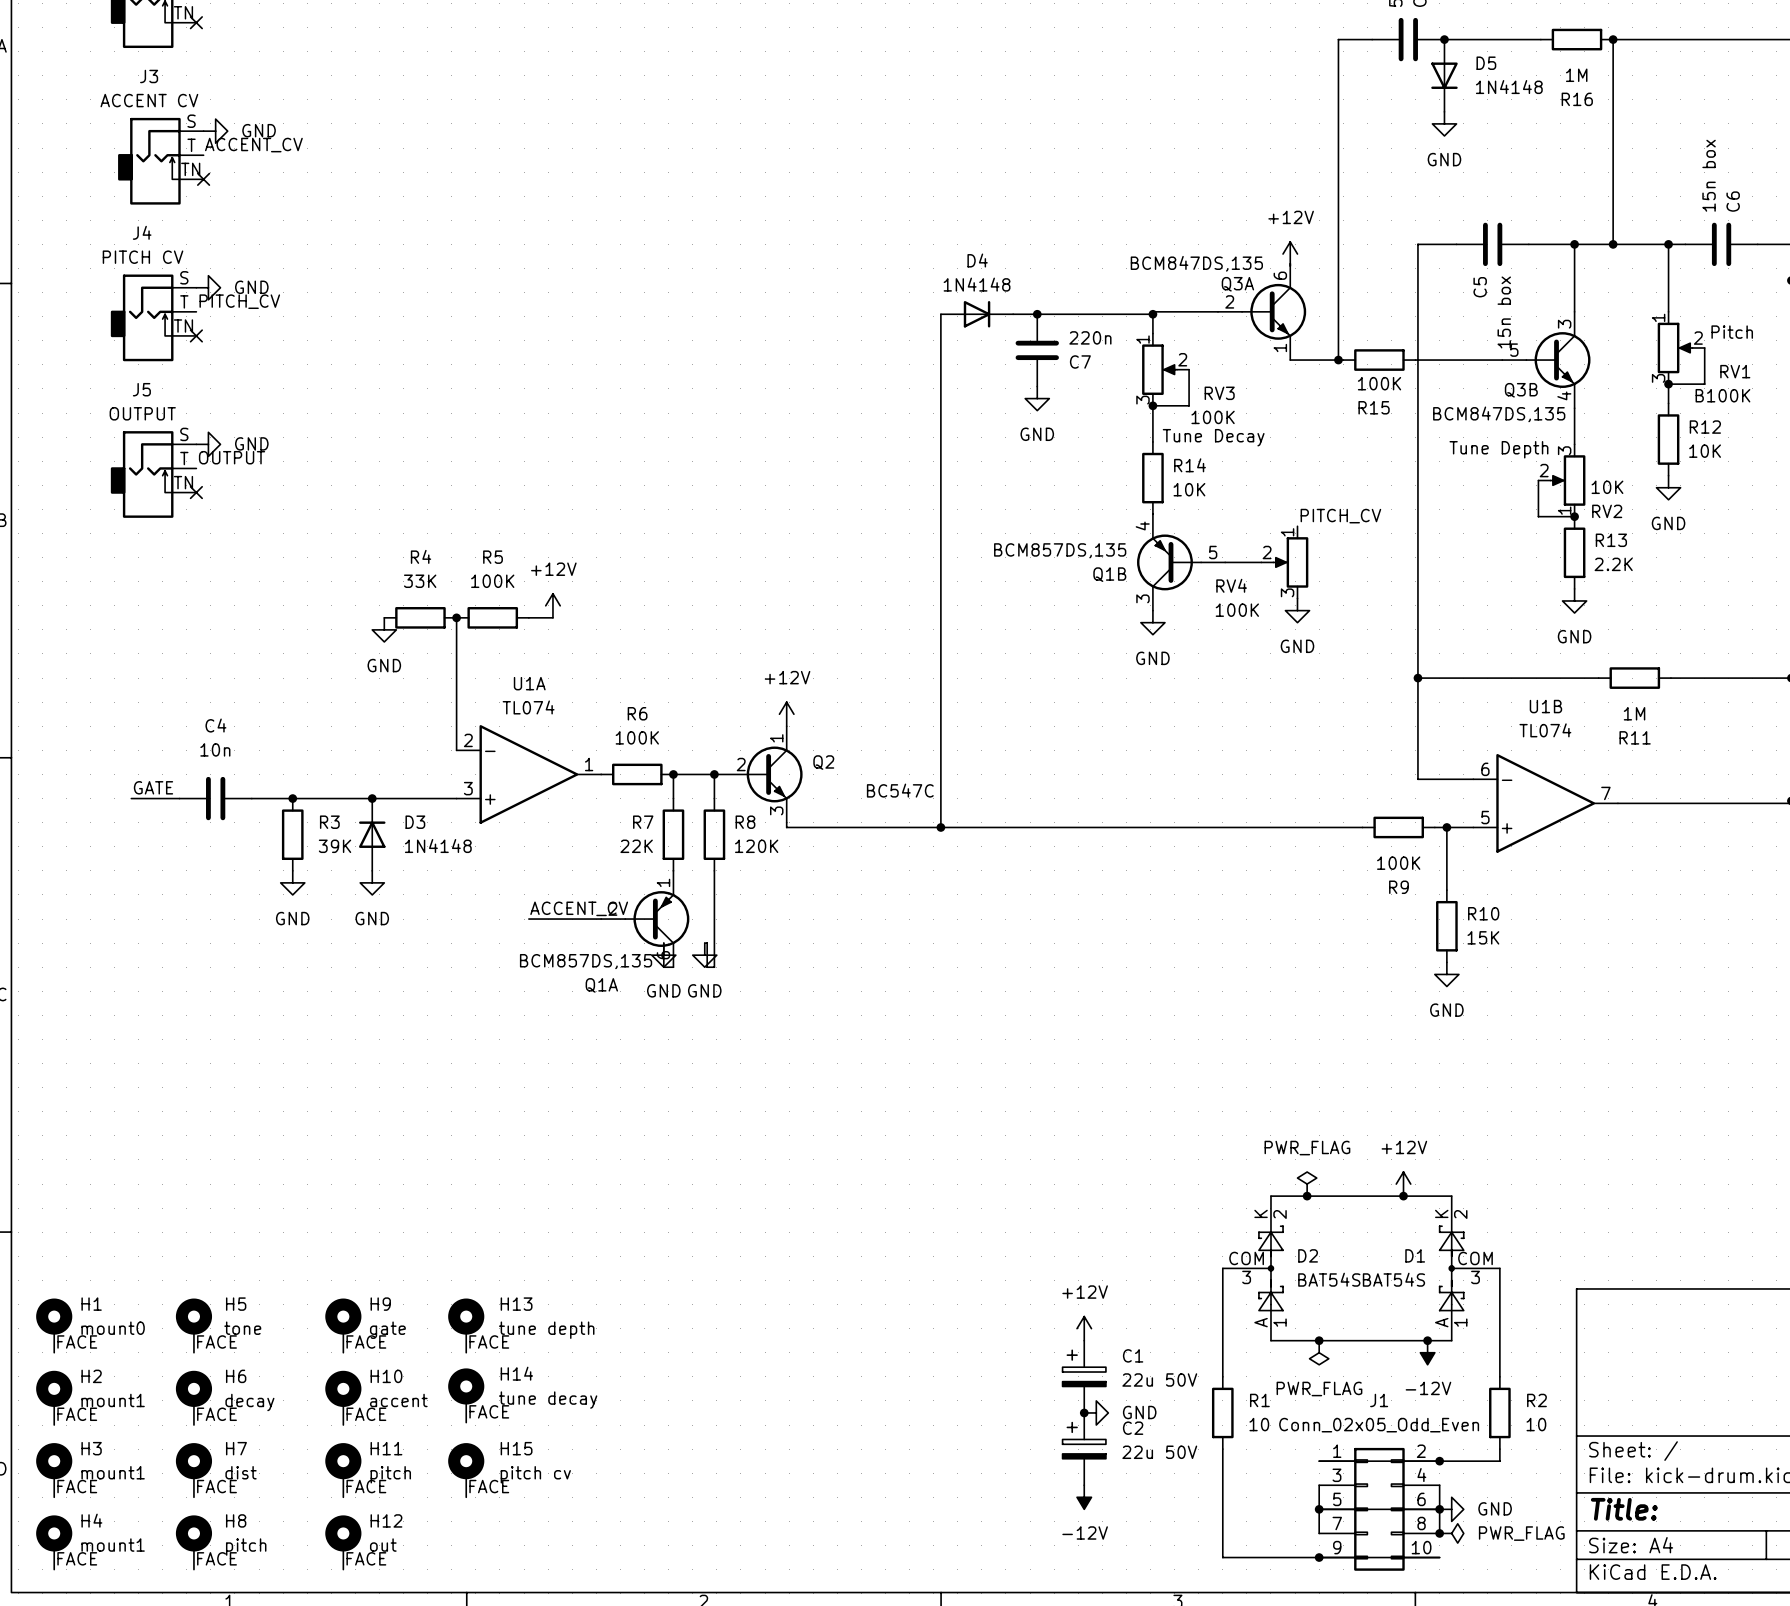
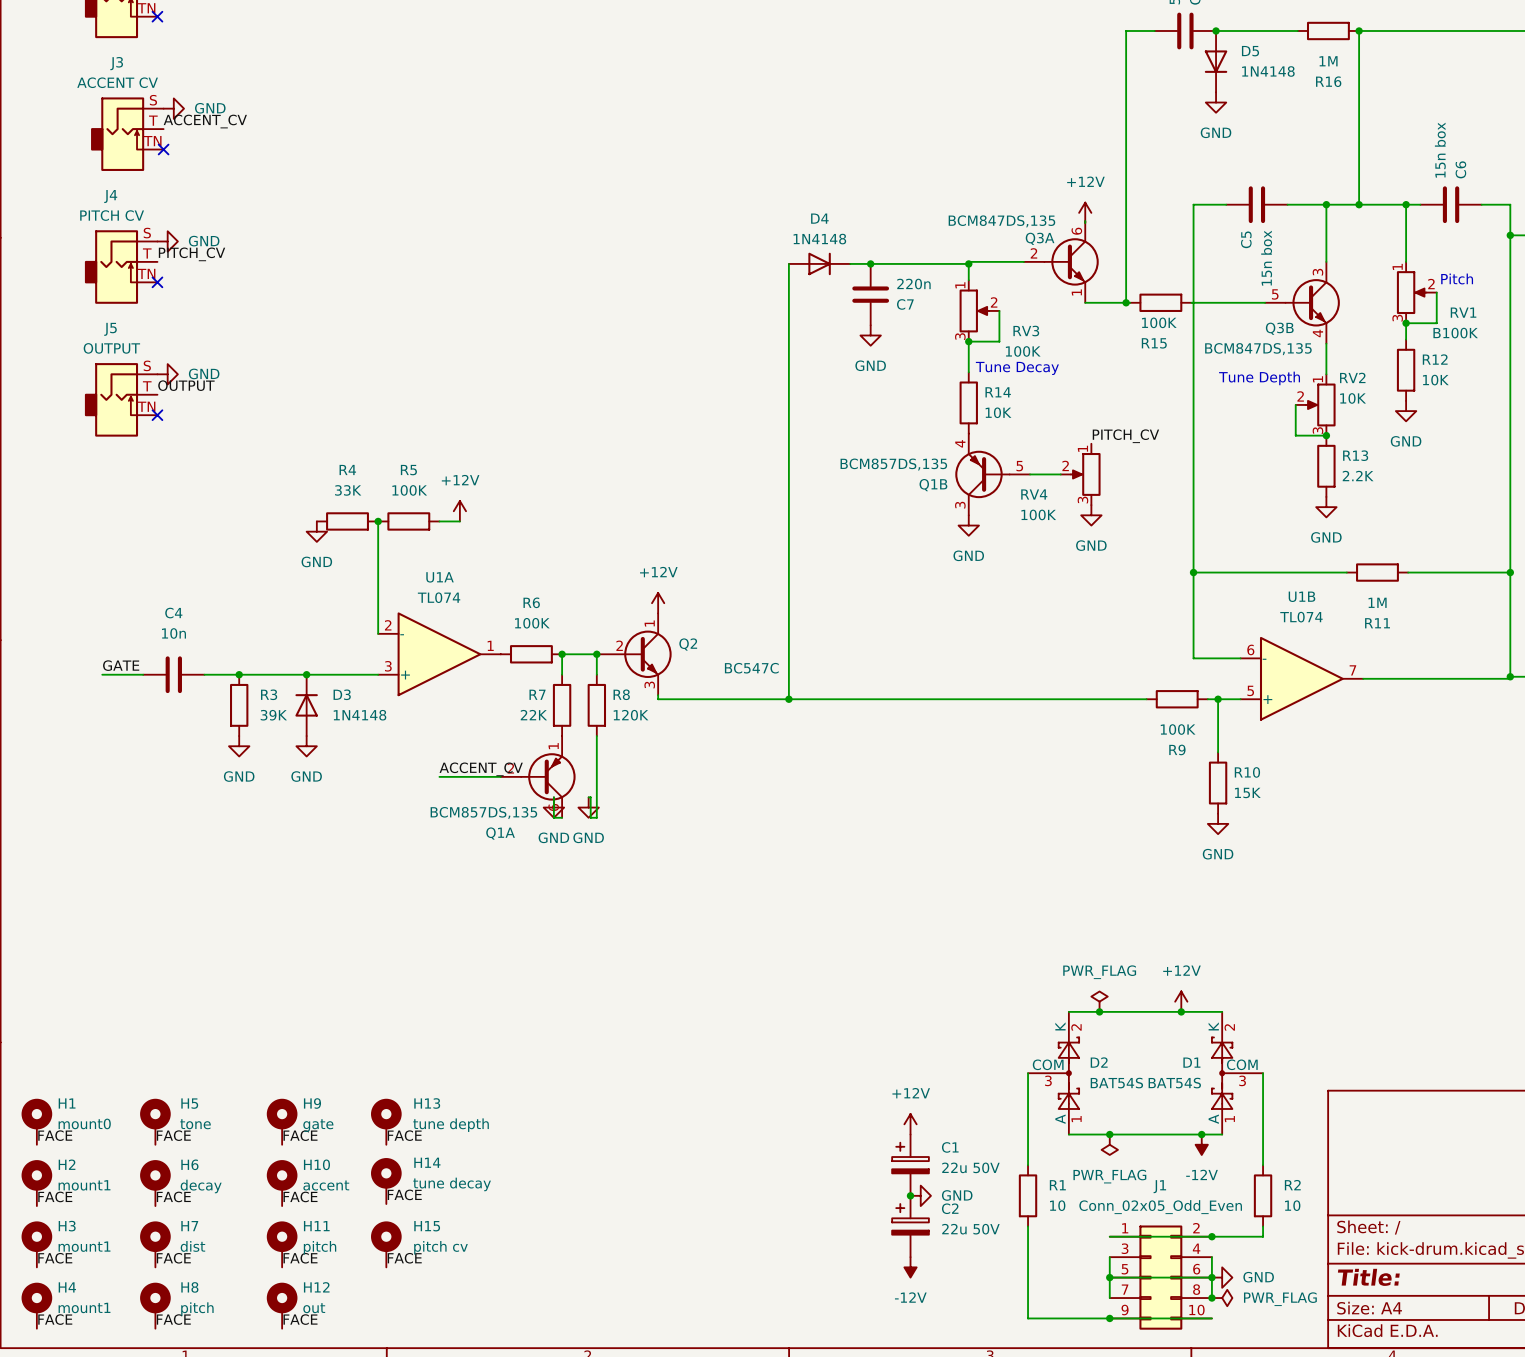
RV2 flip: as is (1567, 480) -> up-down (1320, 404)

